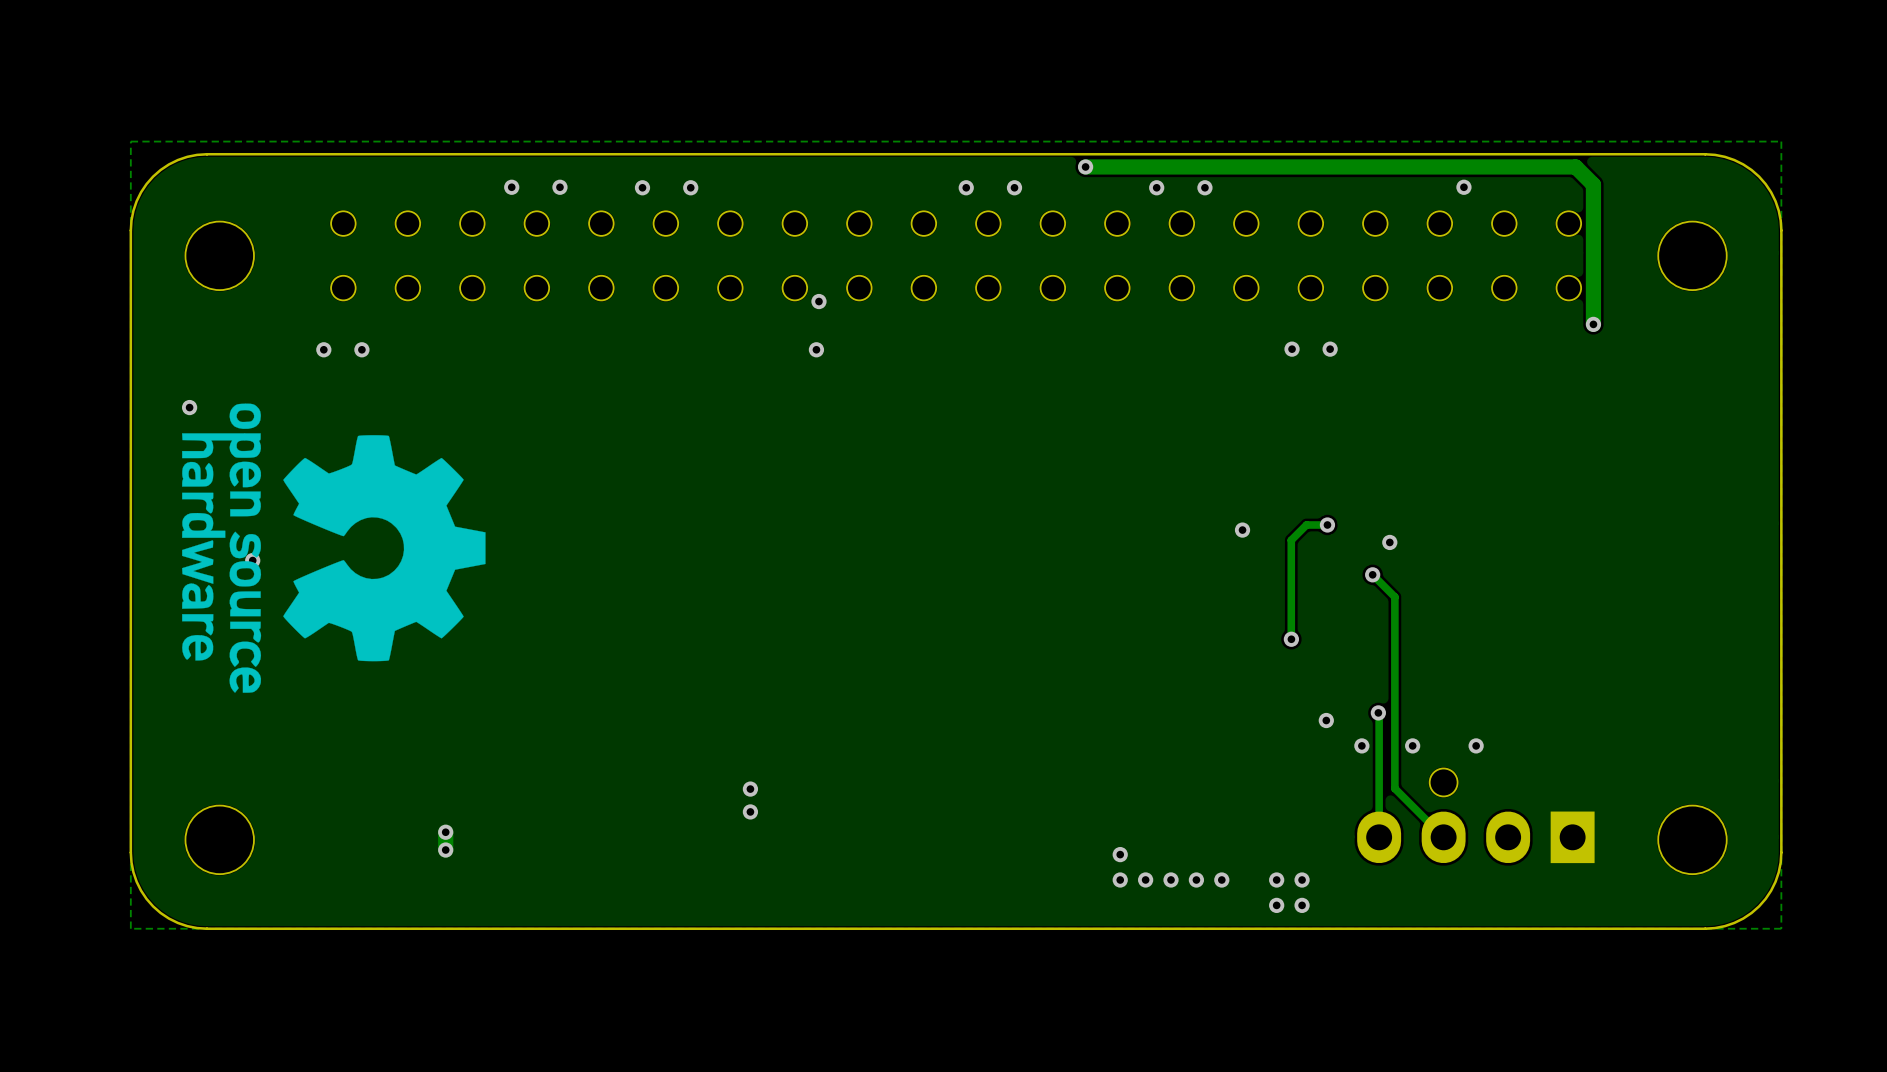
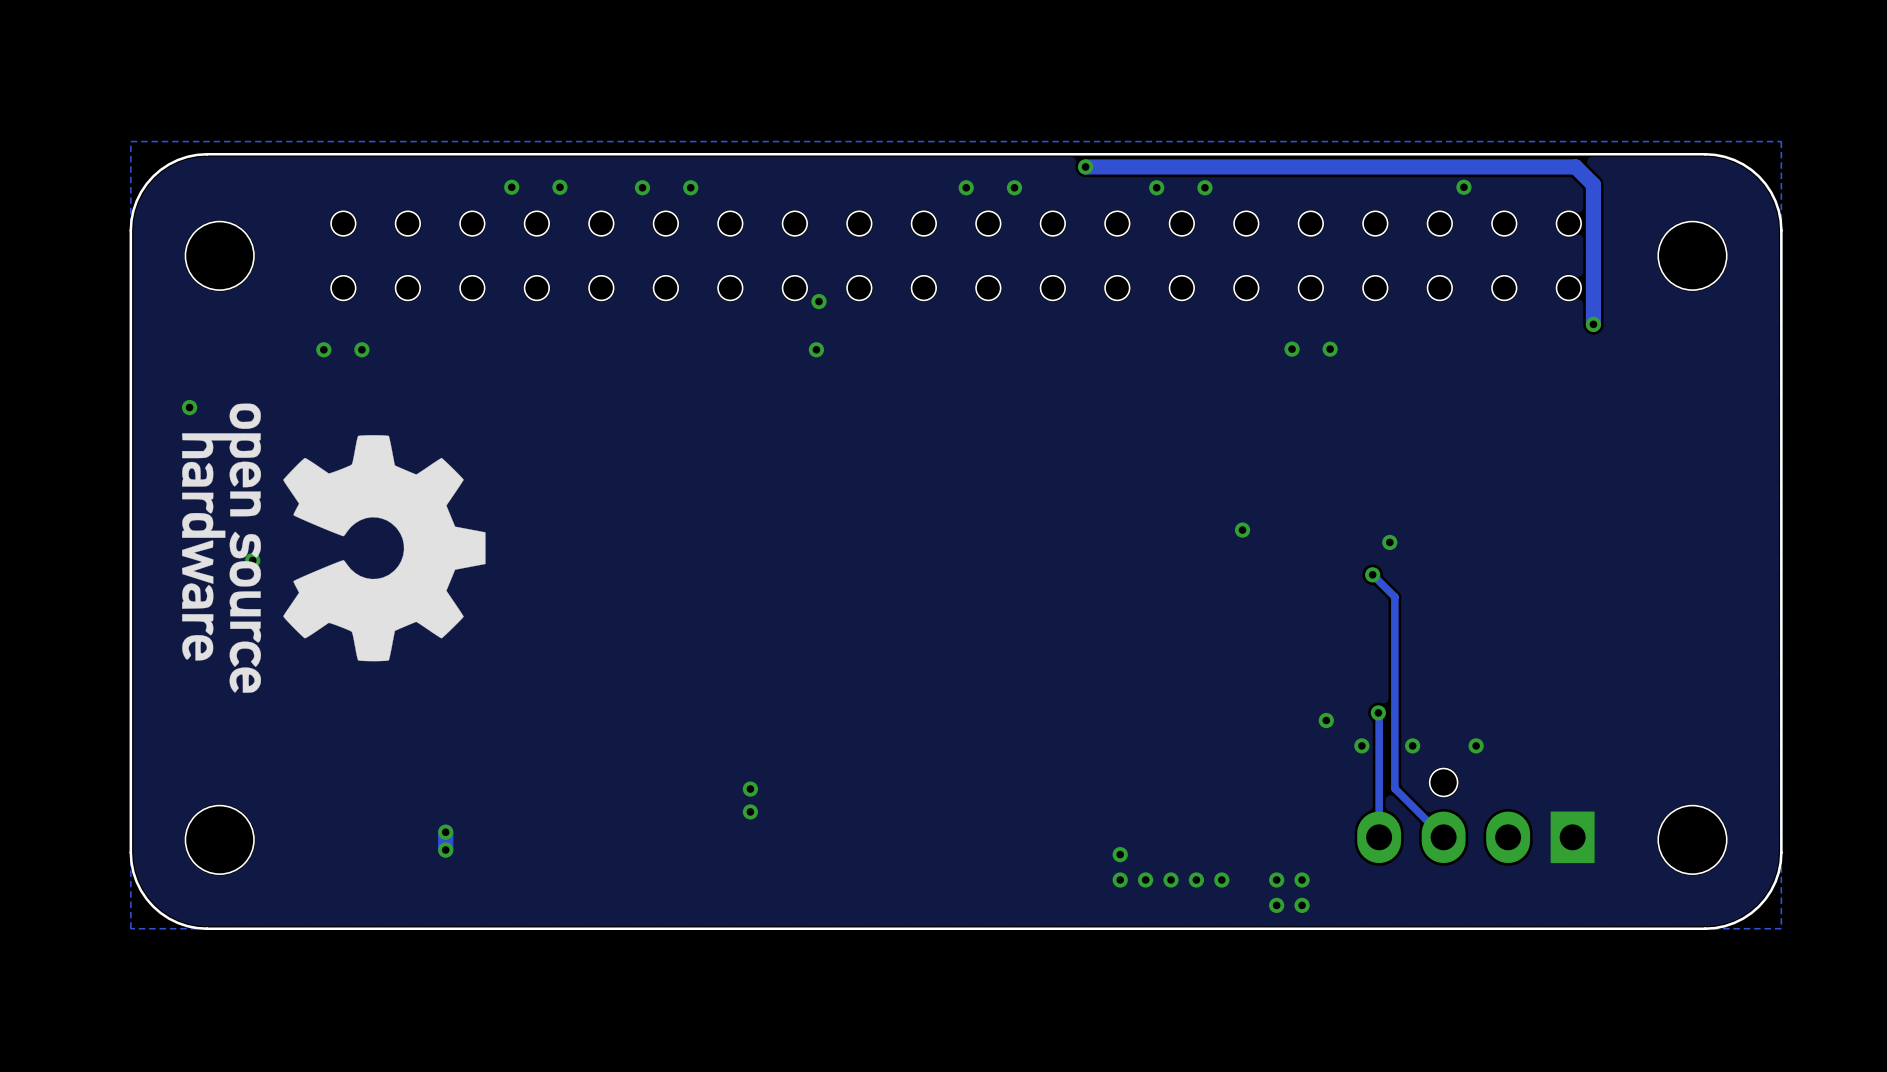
track: (1327, 524) (1306, 524) (1291, 540) (1291, 639) -> none
via: (1327, 524) -> none
via: (1291, 639) -> none

